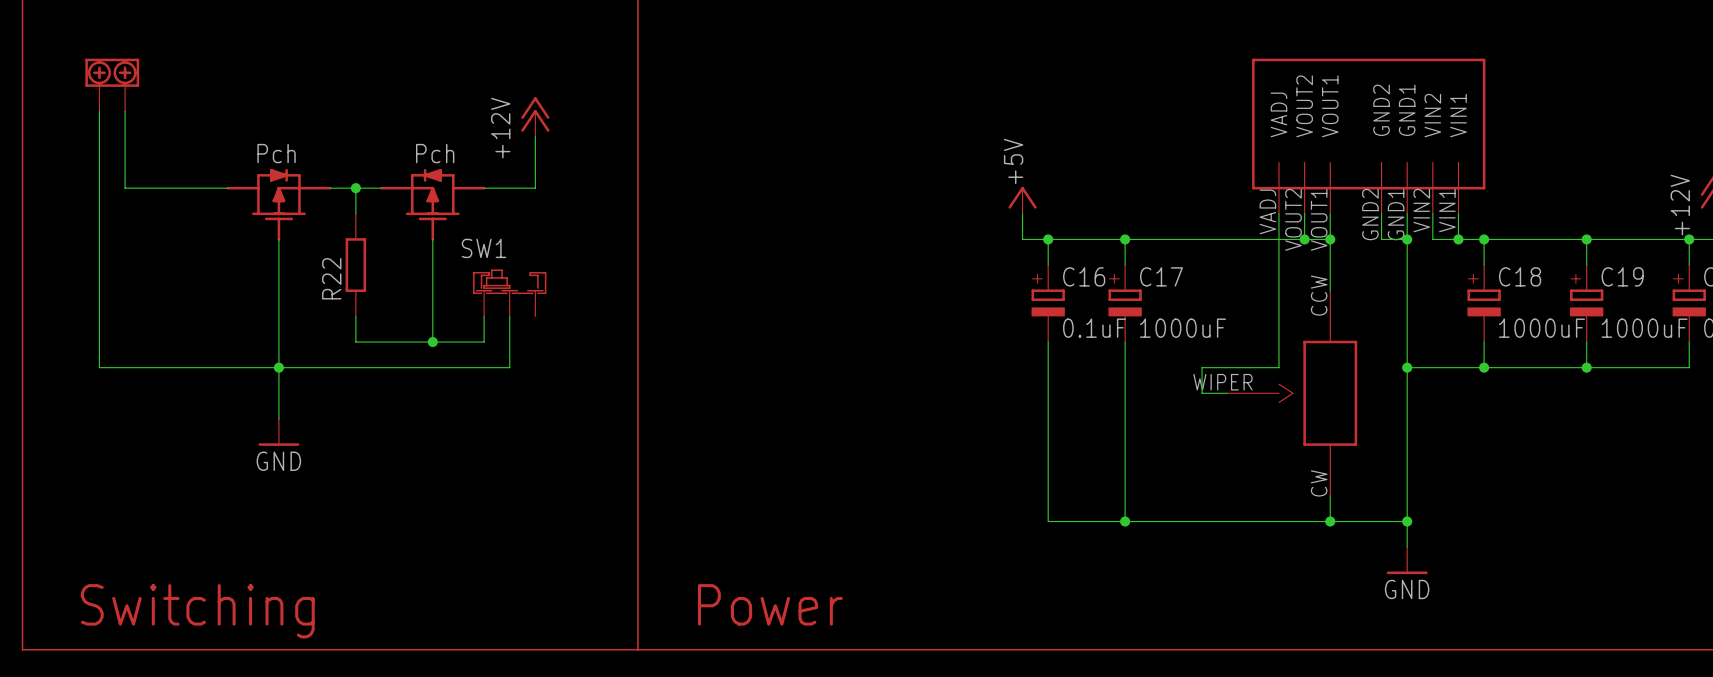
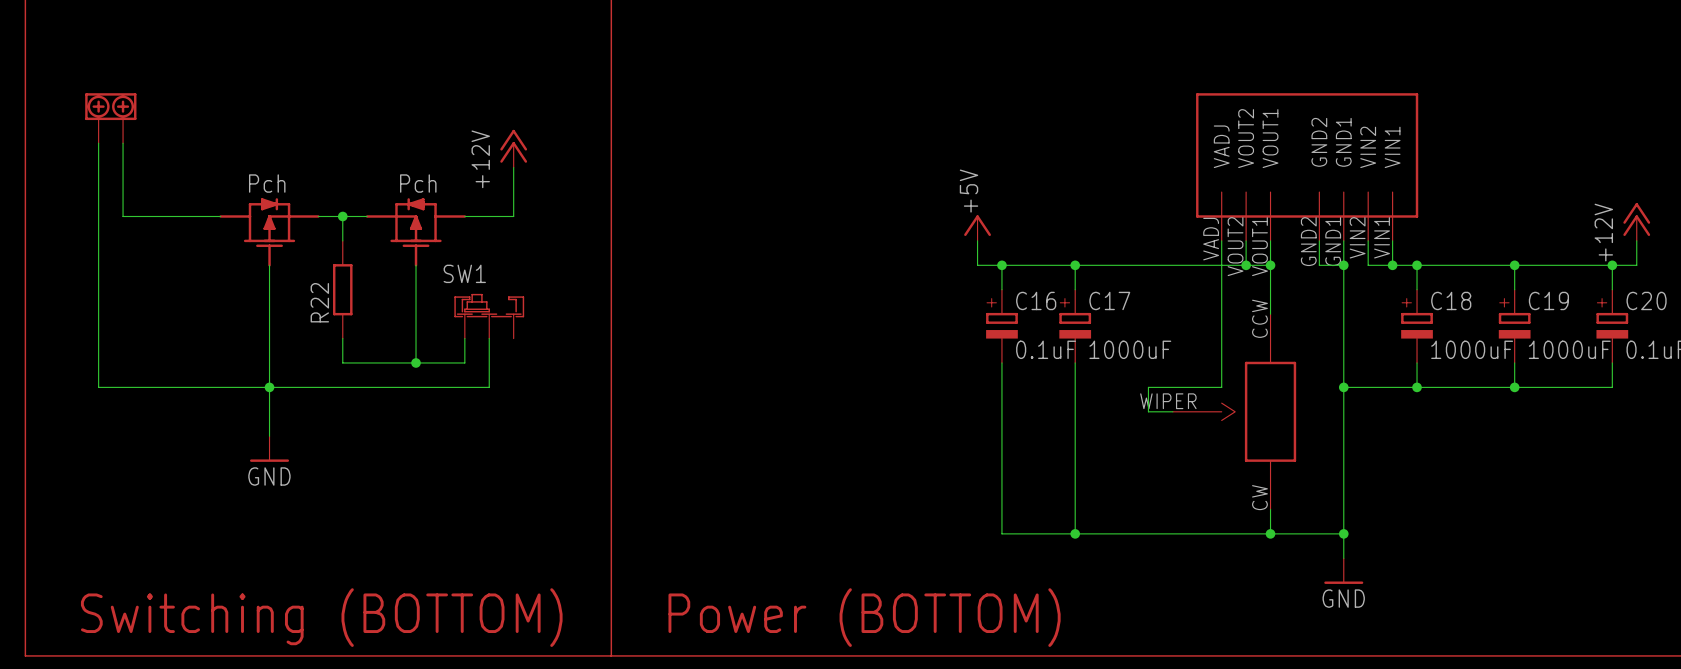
text: Power (770, 604) -> Power (BOTTOM) (864, 617)
text: Switching (197, 611) -> Switching (BOTTOM) (321, 617)

